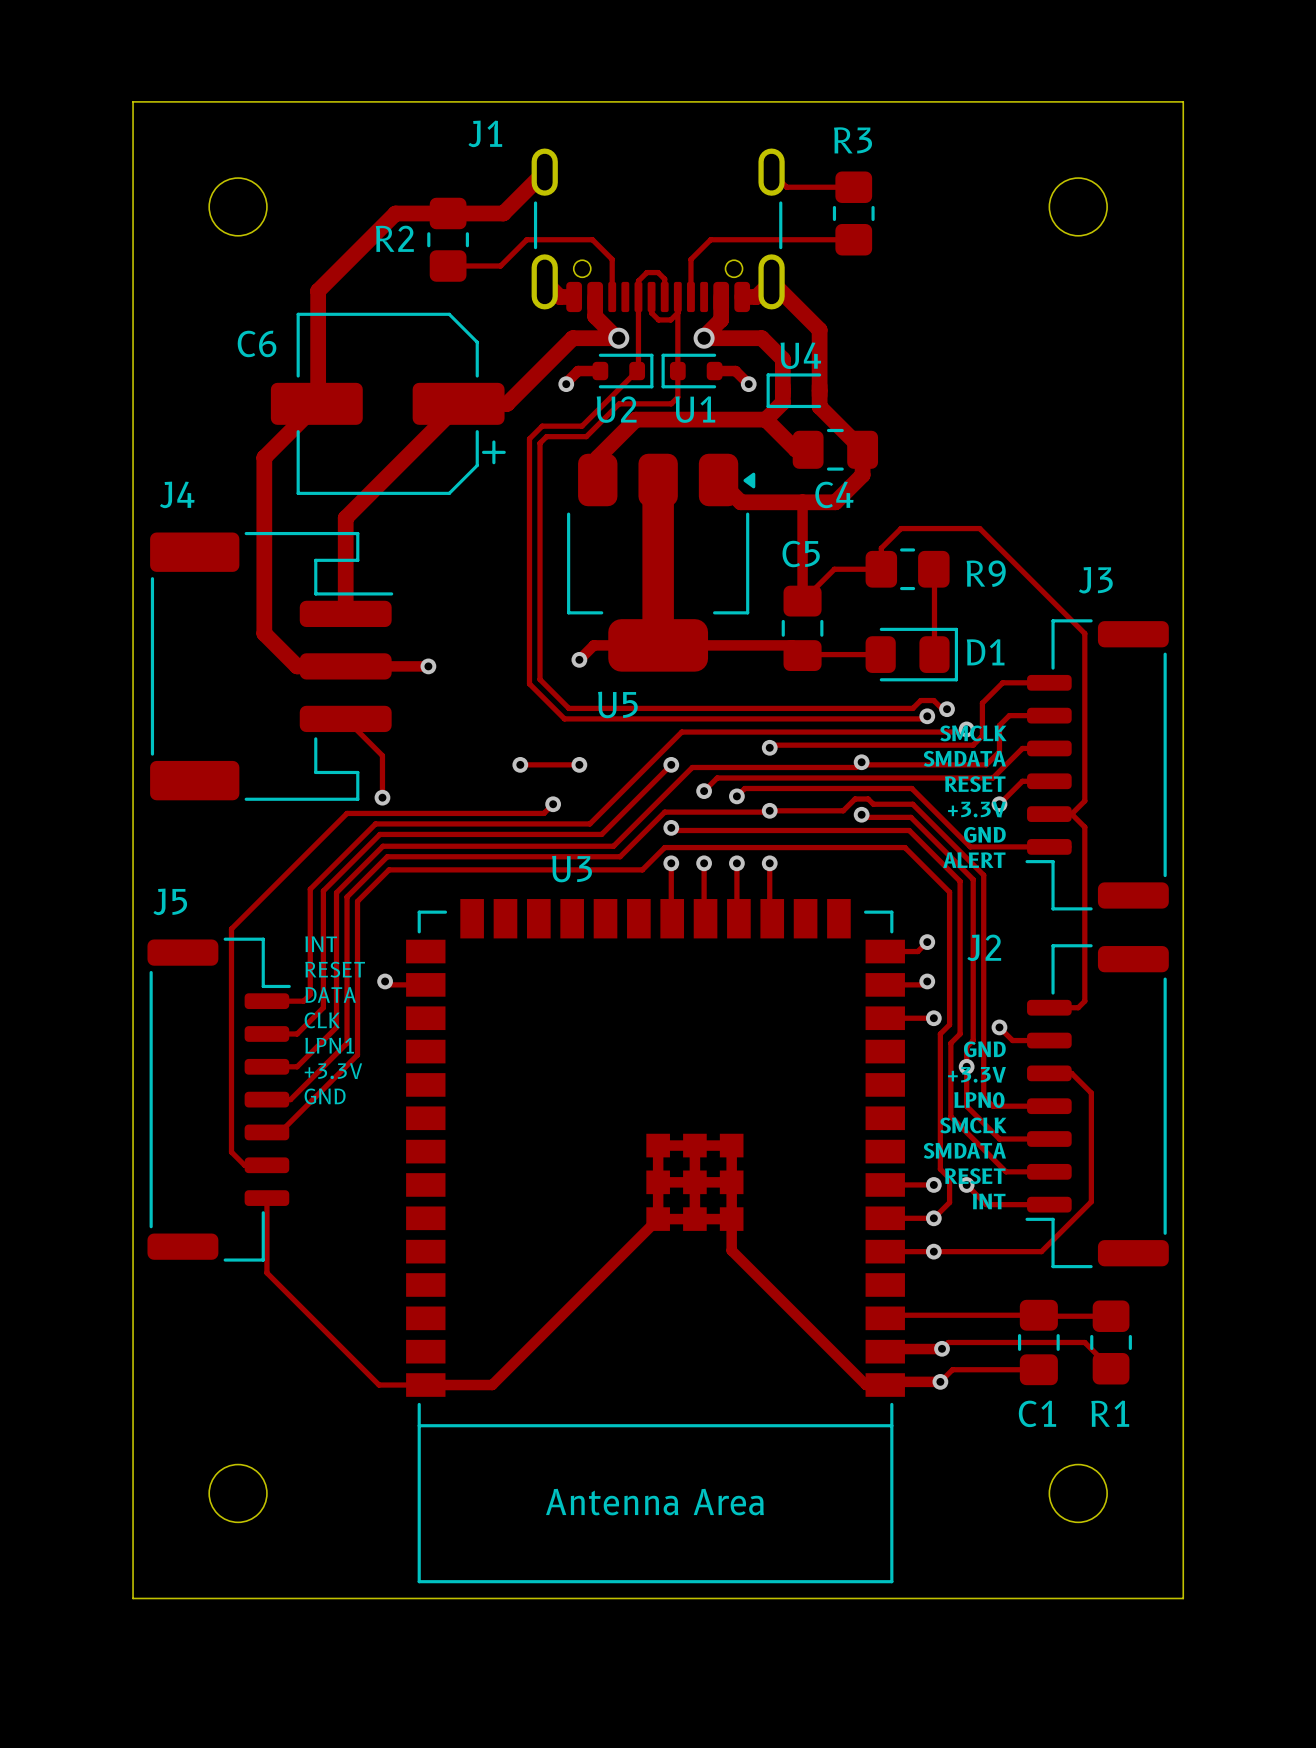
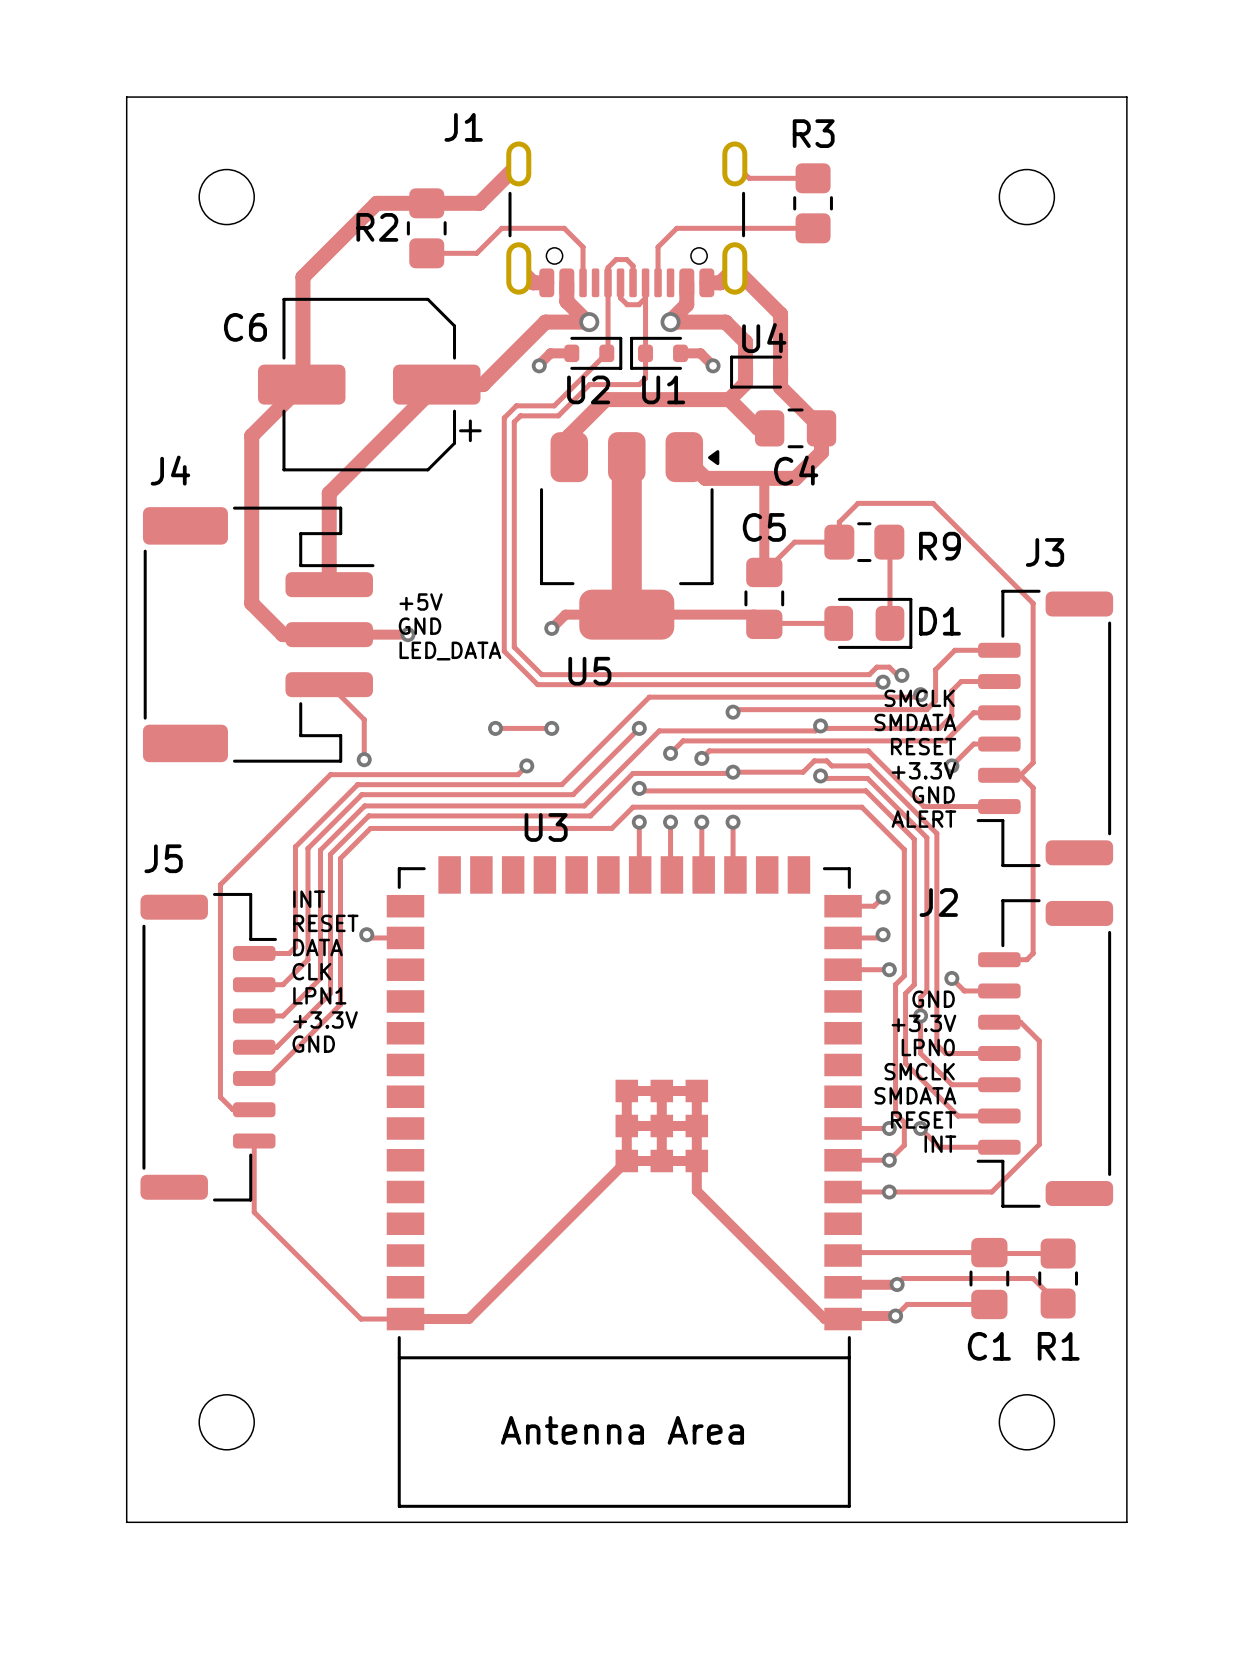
text: none -> +5V (421, 602)
text: none -> GND (420, 626)
text: none -> LED_DATA (450, 651)

